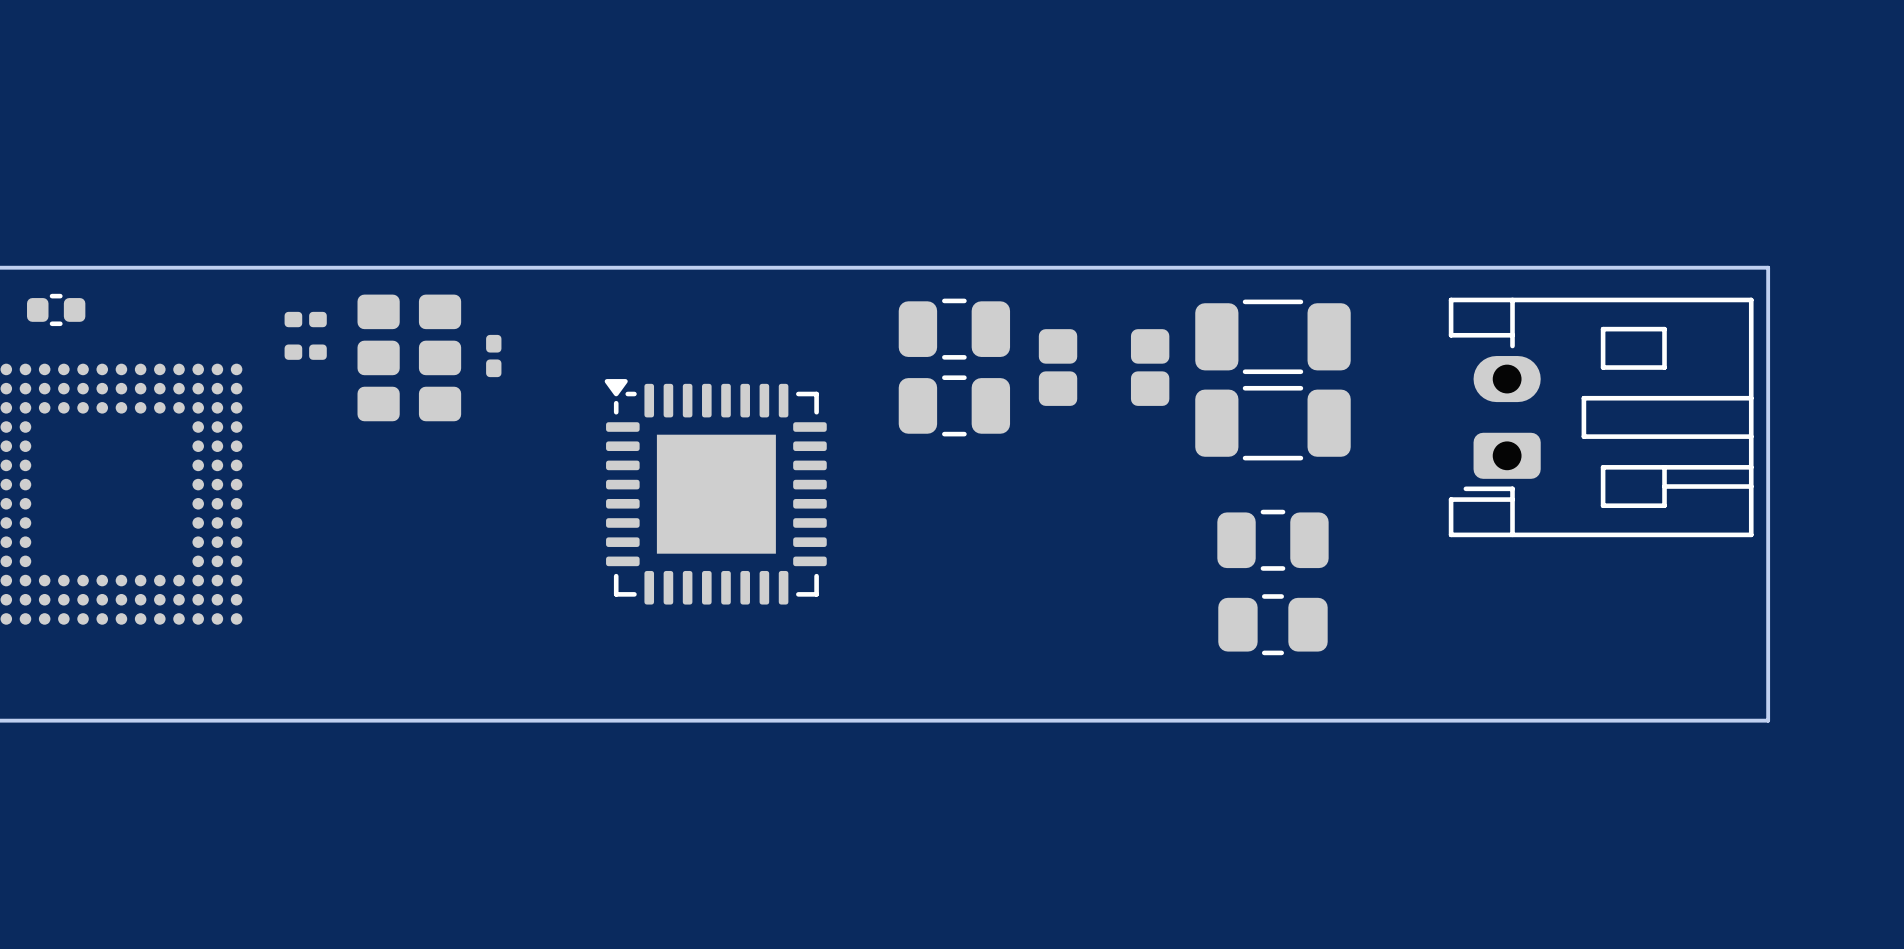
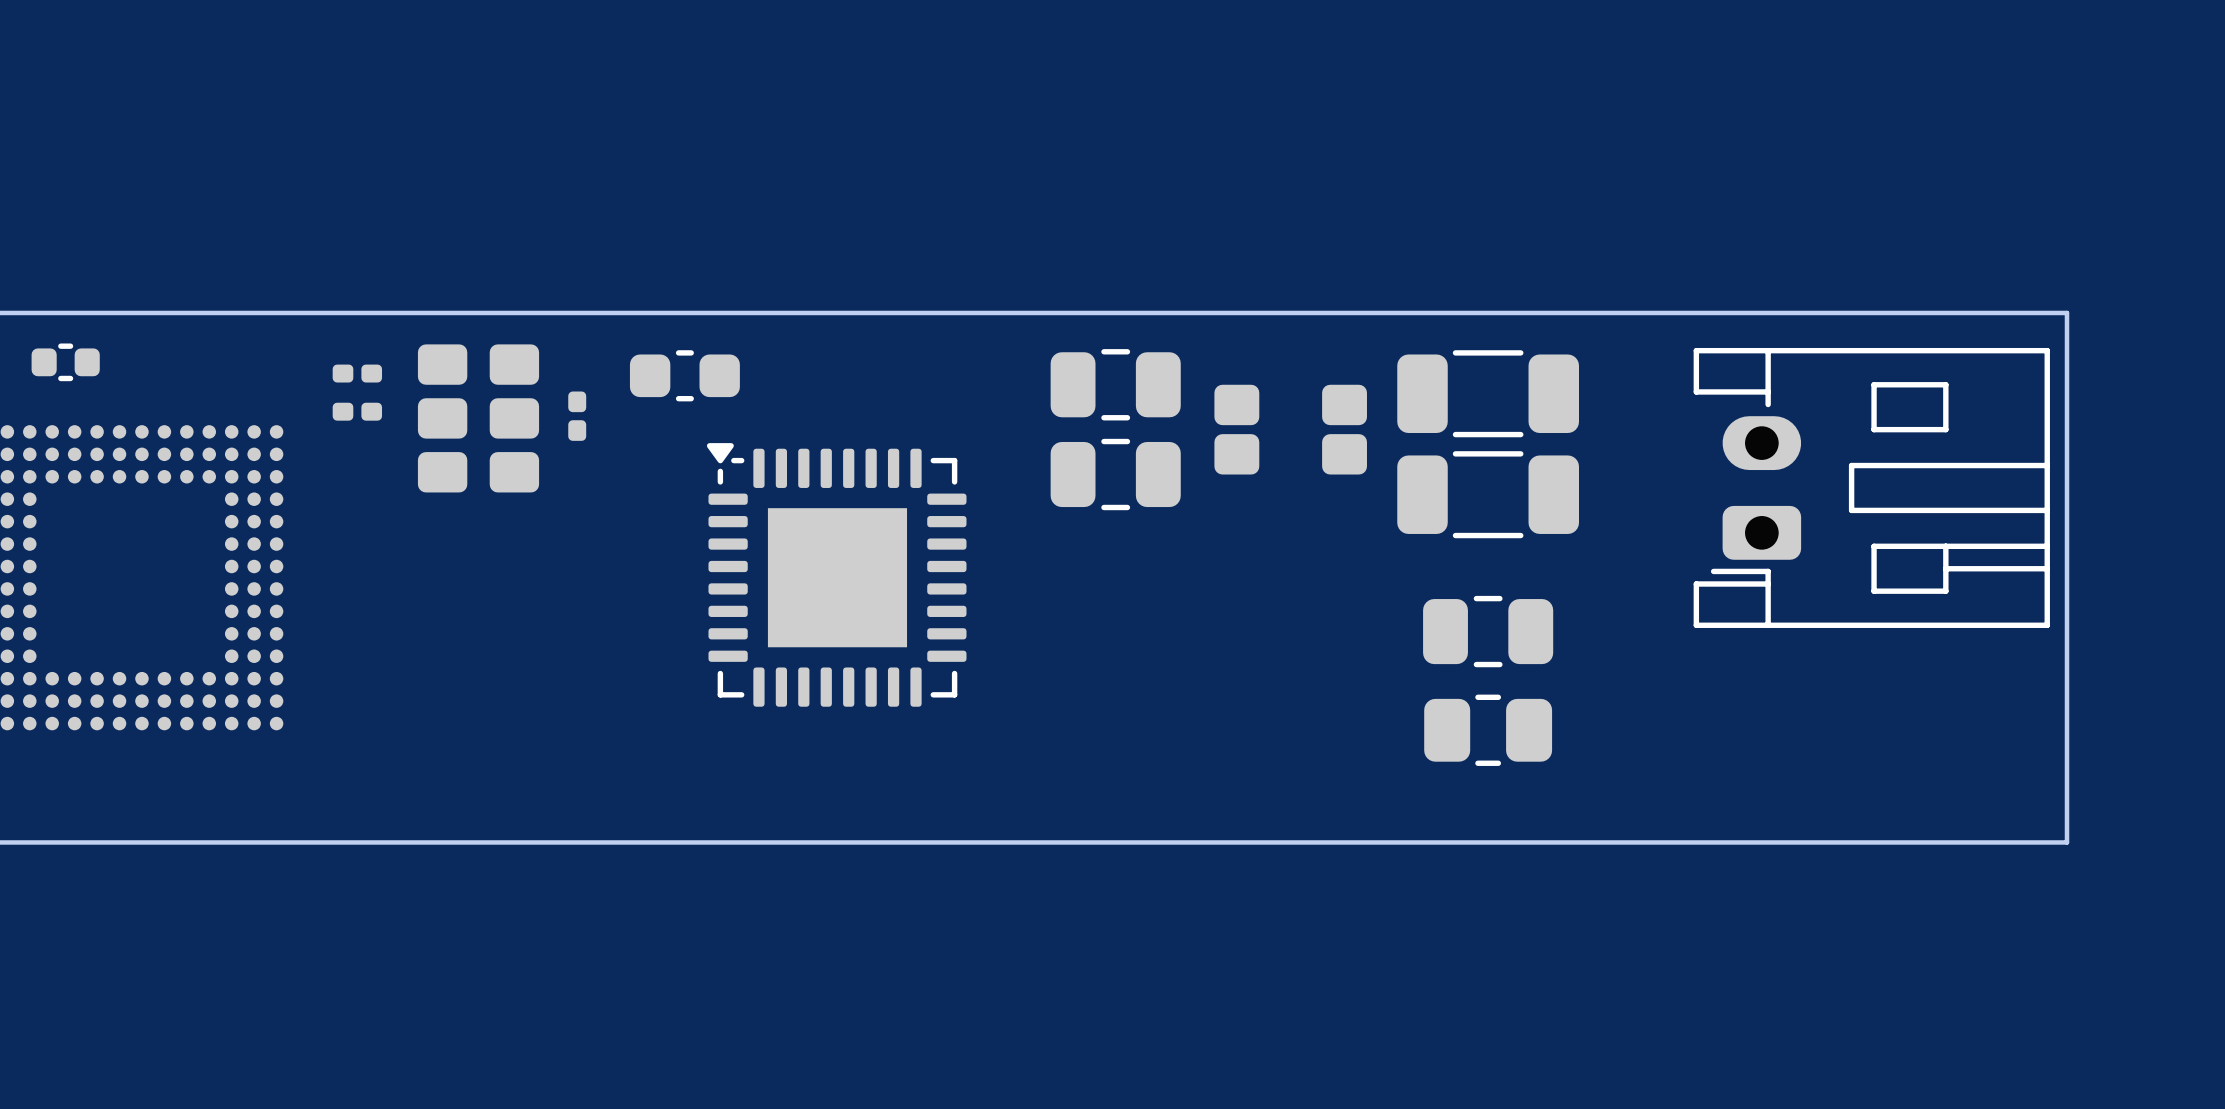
part: none -> (684, 375)

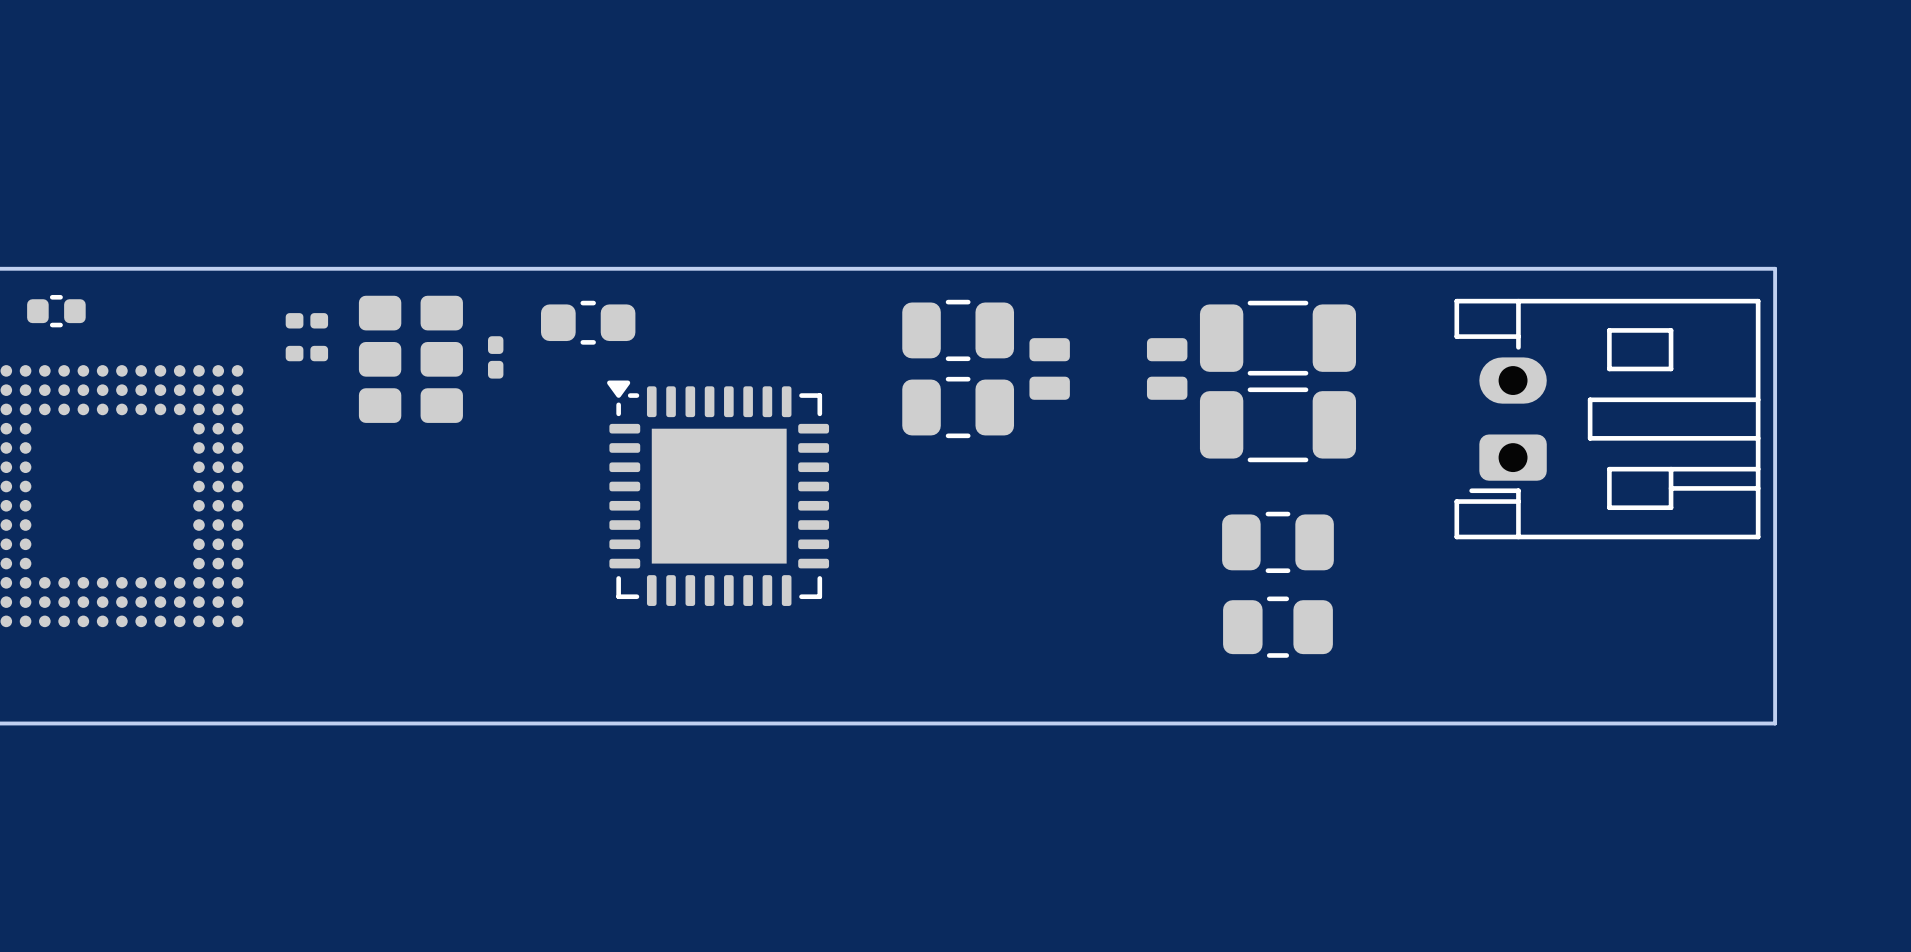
part footprint: [1214, 384, 1367, 475] -> [1029, 338, 1188, 400]
part footprint: [706, 443, 967, 707] -> [607, 380, 830, 606]

